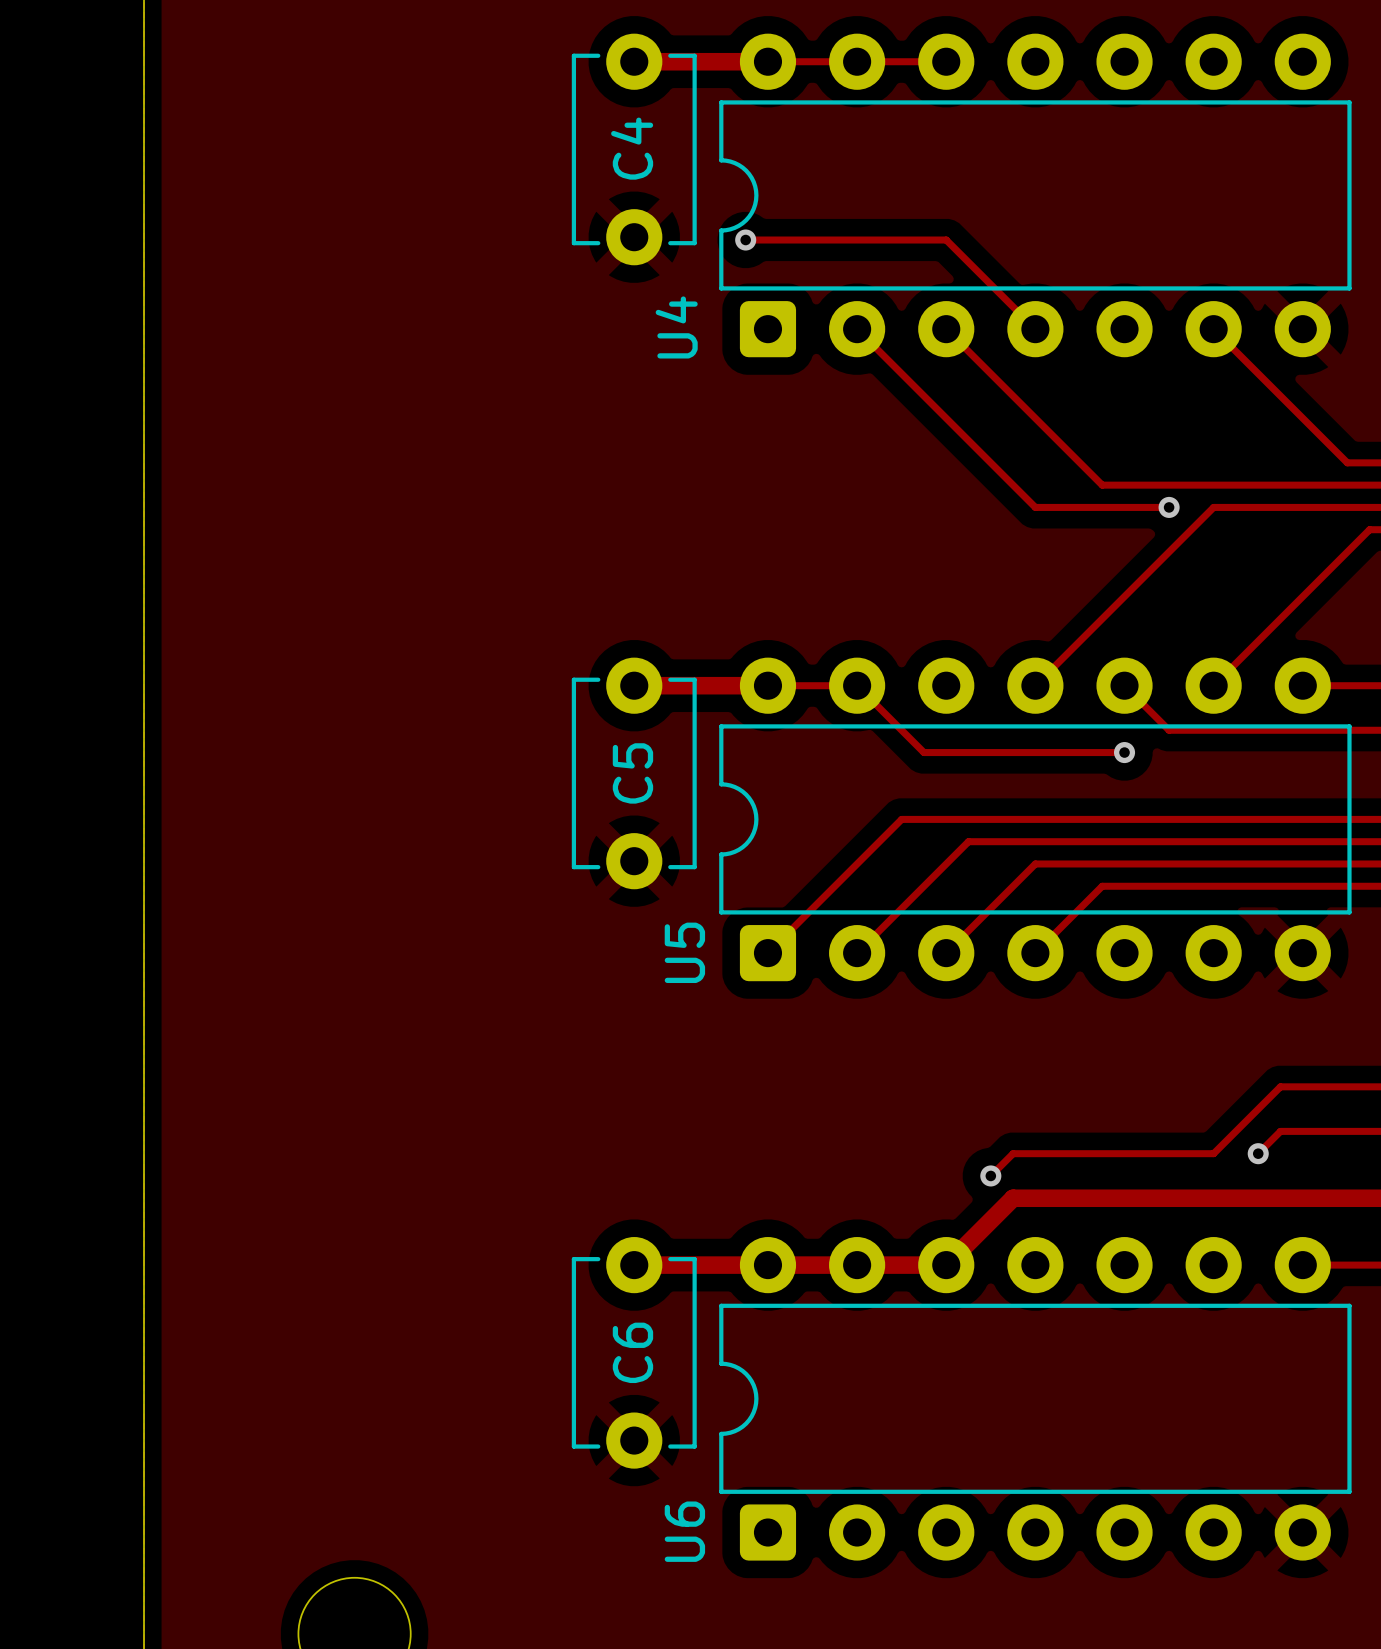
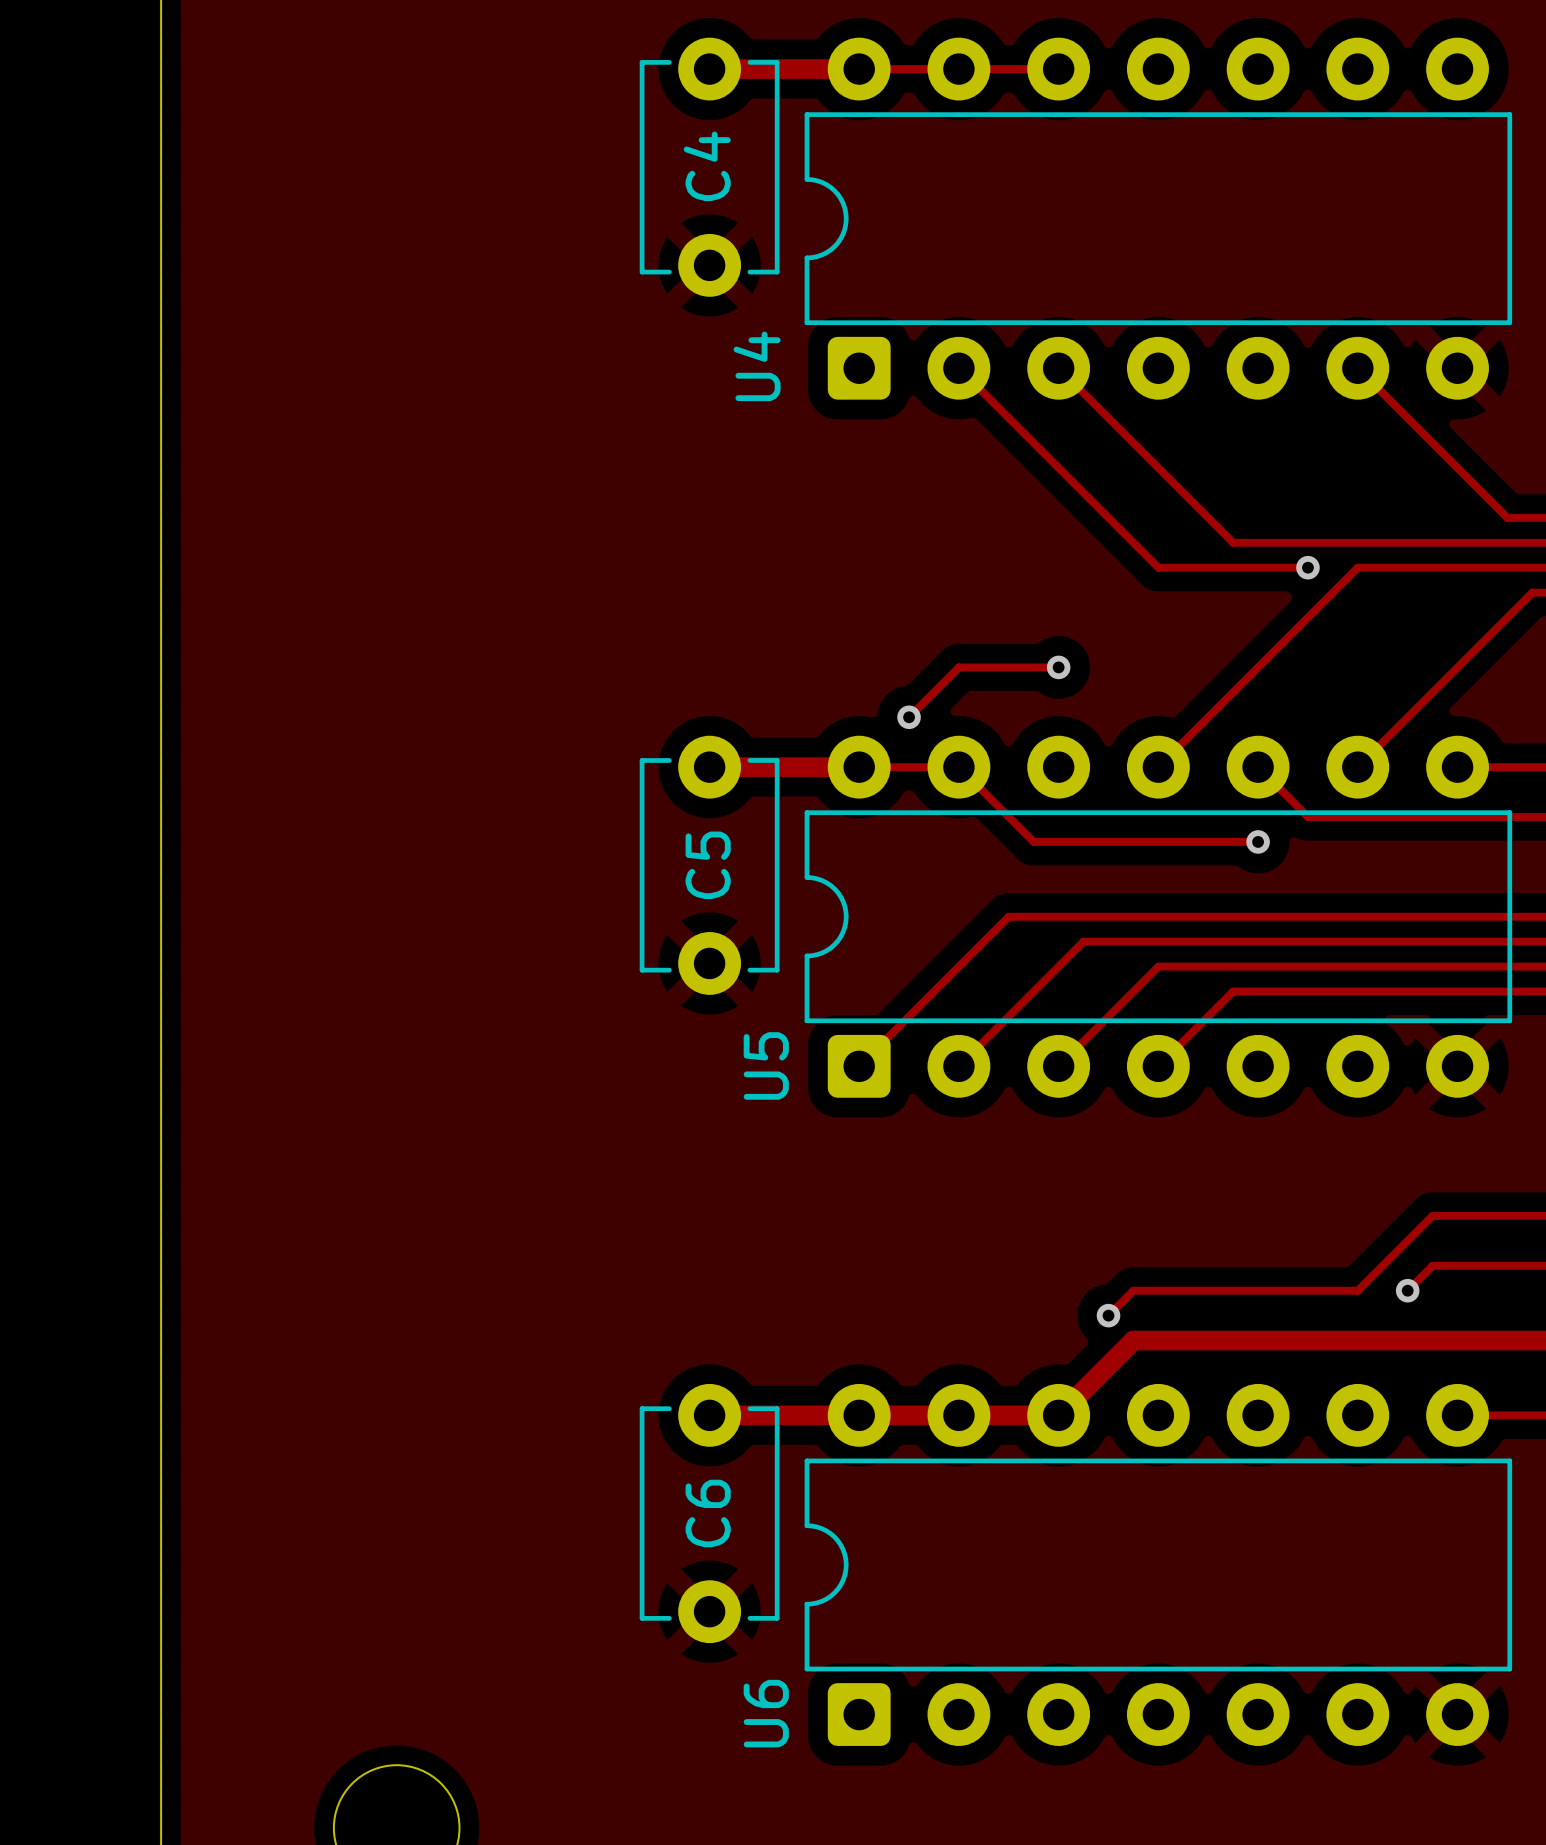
track: (745, 240) (946, 240) (1035, 329) -> none
via: (745, 240) -> none
track: none -> (1058, 667) (958, 667) (909, 717)
via: none -> (1058, 667)
via: none -> (909, 717)

